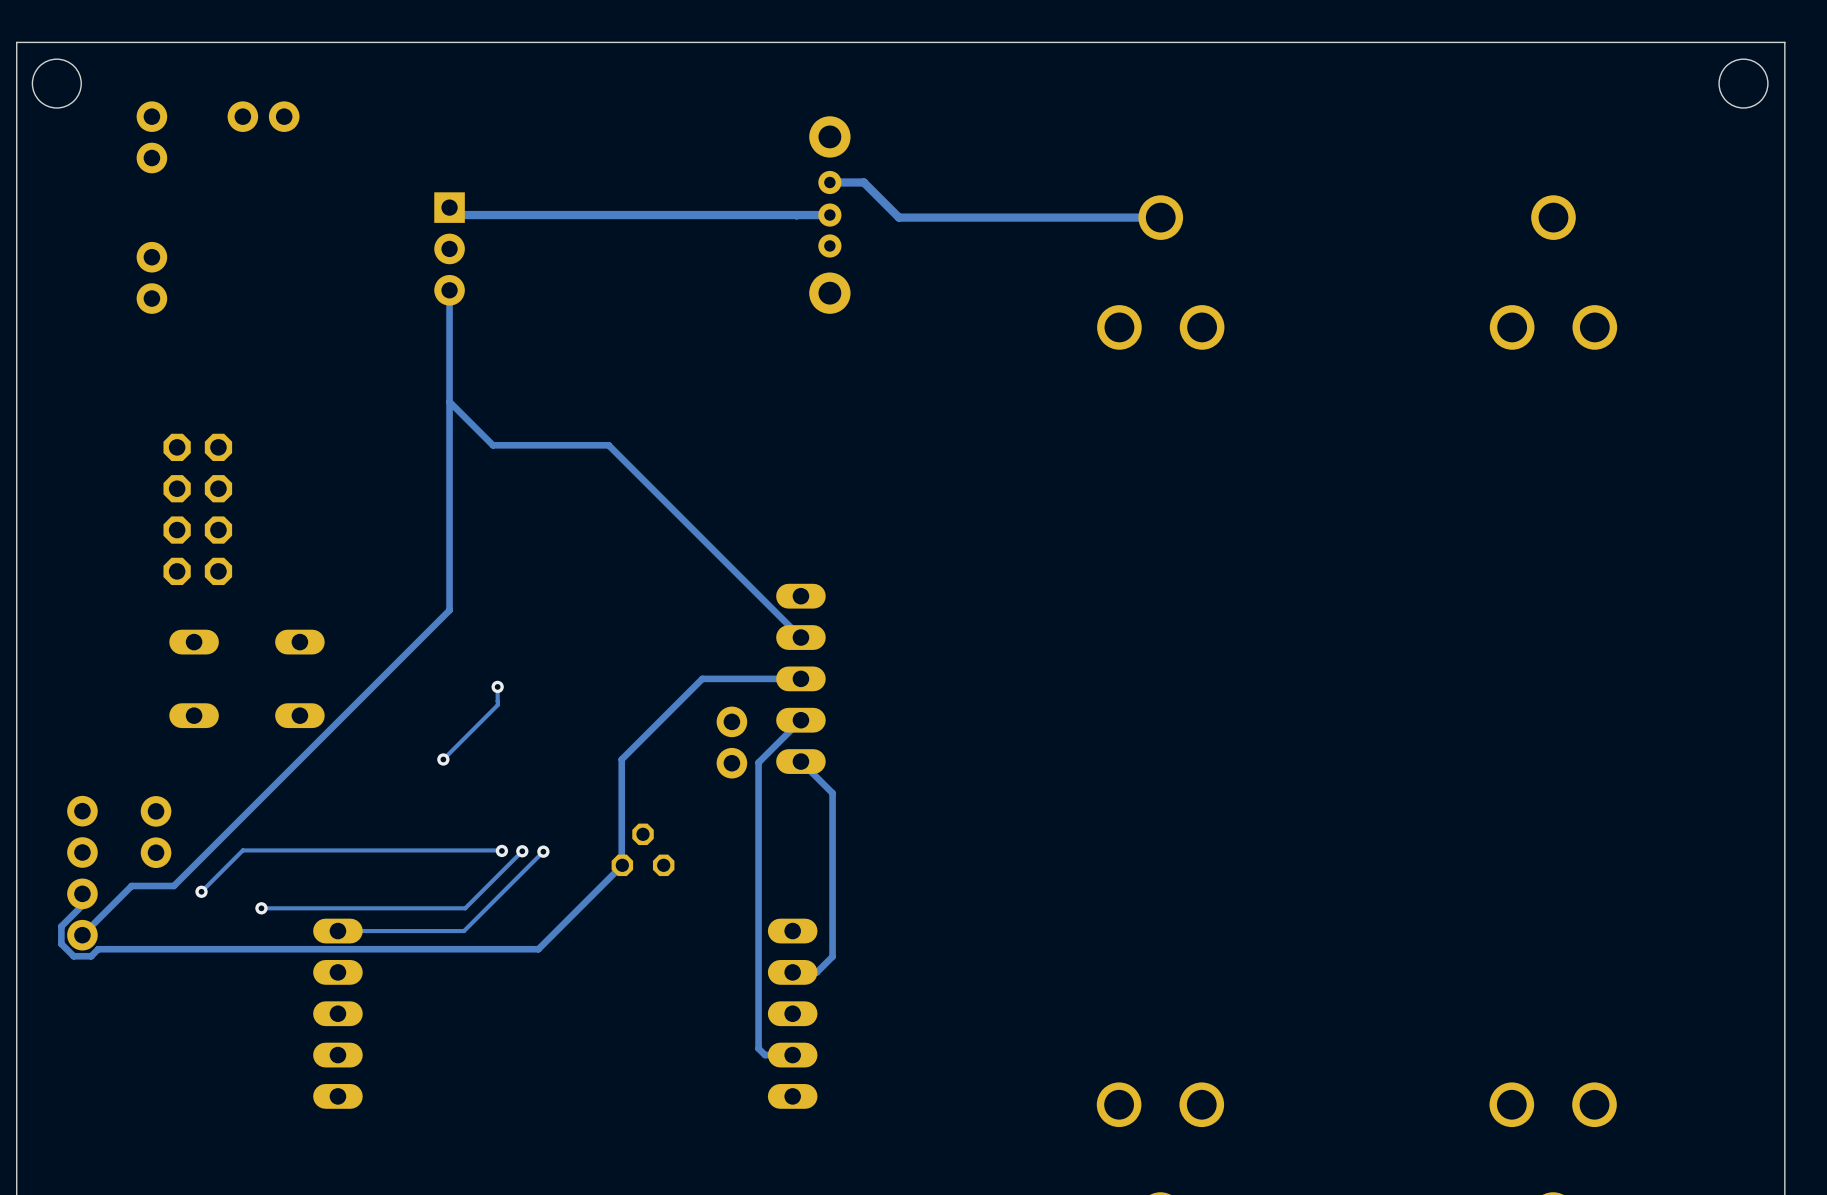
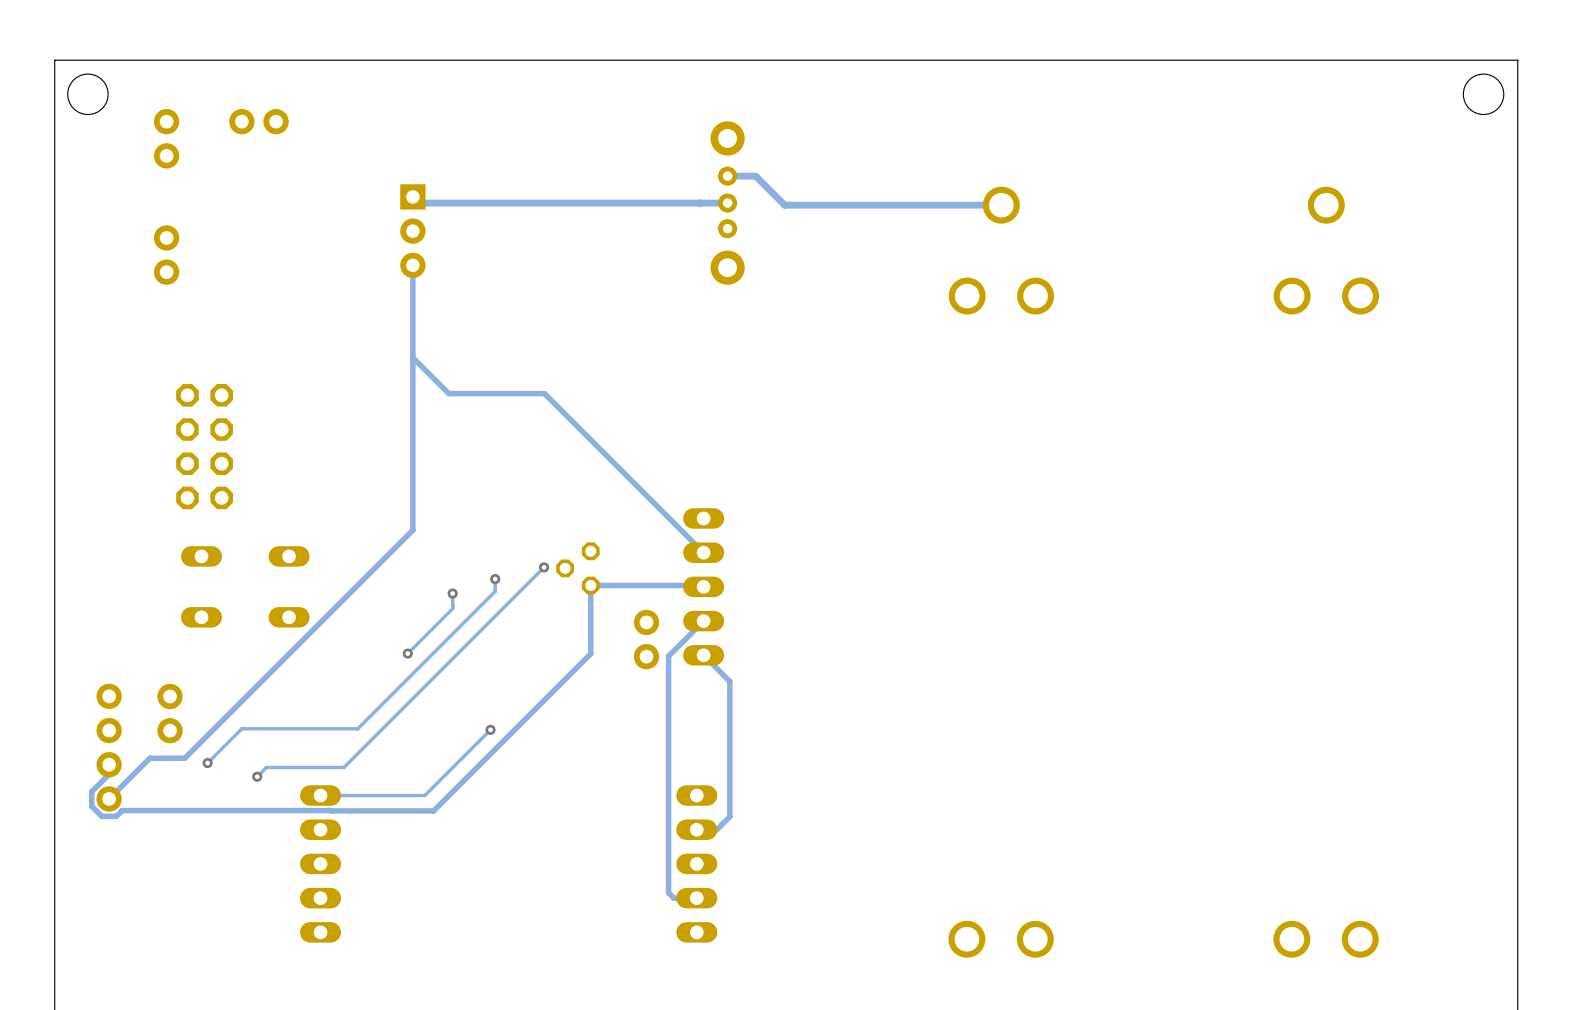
via: none -> (544, 567)
via: none -> (495, 579)
track: (800, 678) (702, 678) (621, 759) (622, 865) (538, 949) (351, 949) -> (703, 586) (590, 585) (590, 653) (433, 810) (331, 810)
part rotation: 0° (643, 849) -> 90° counterclockwise (577, 568)
part position: (643, 849) -> (577, 568)
track: (382, 850) (501, 850) -> (357, 728) (495, 591) (495, 579)
via: (501, 850) -> none
track: (522, 851) (465, 908) (261, 908) -> (544, 567) (343, 767) (266, 767) (257, 776)
via: (522, 851) -> none

